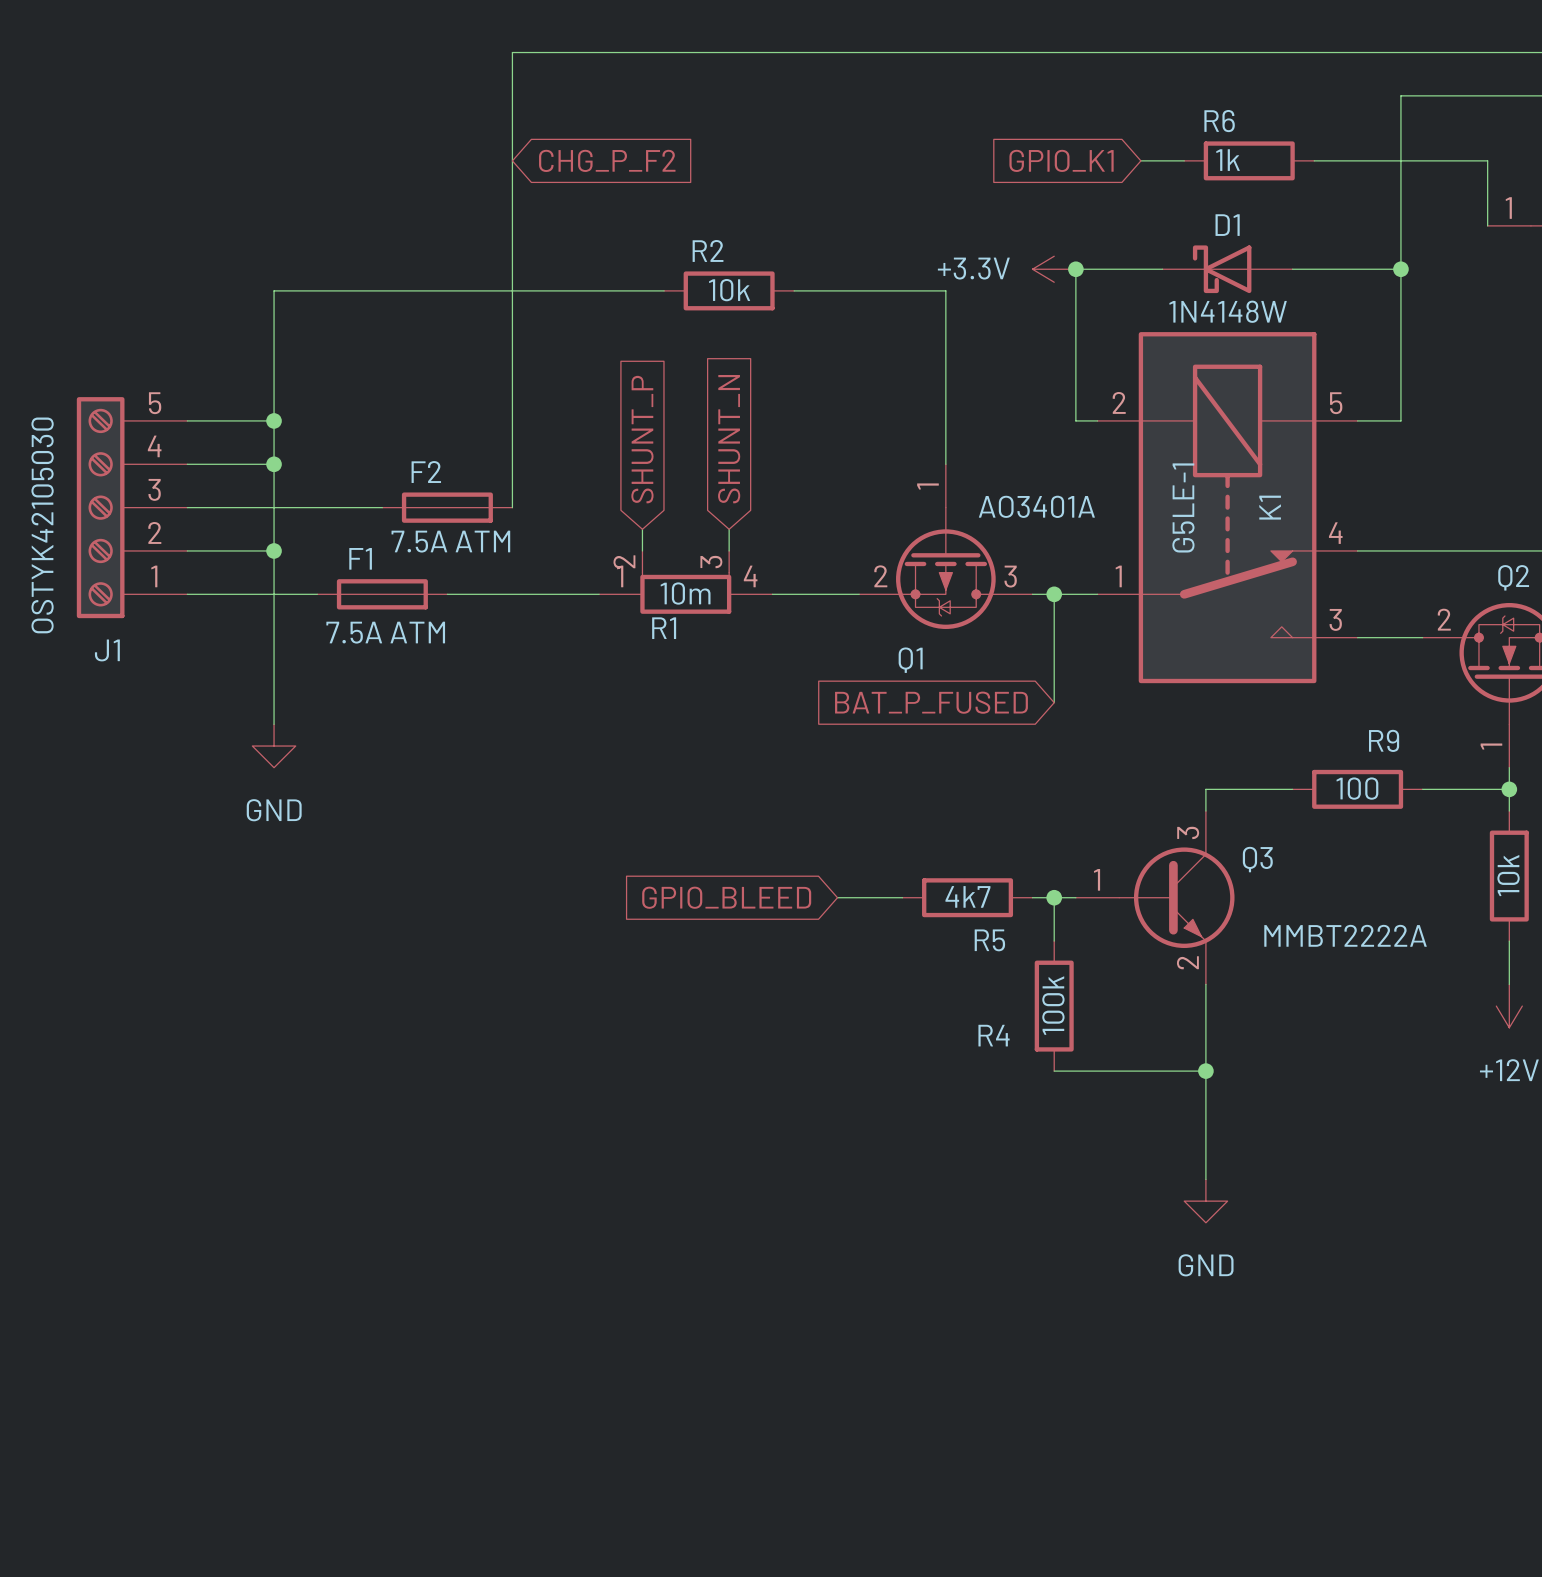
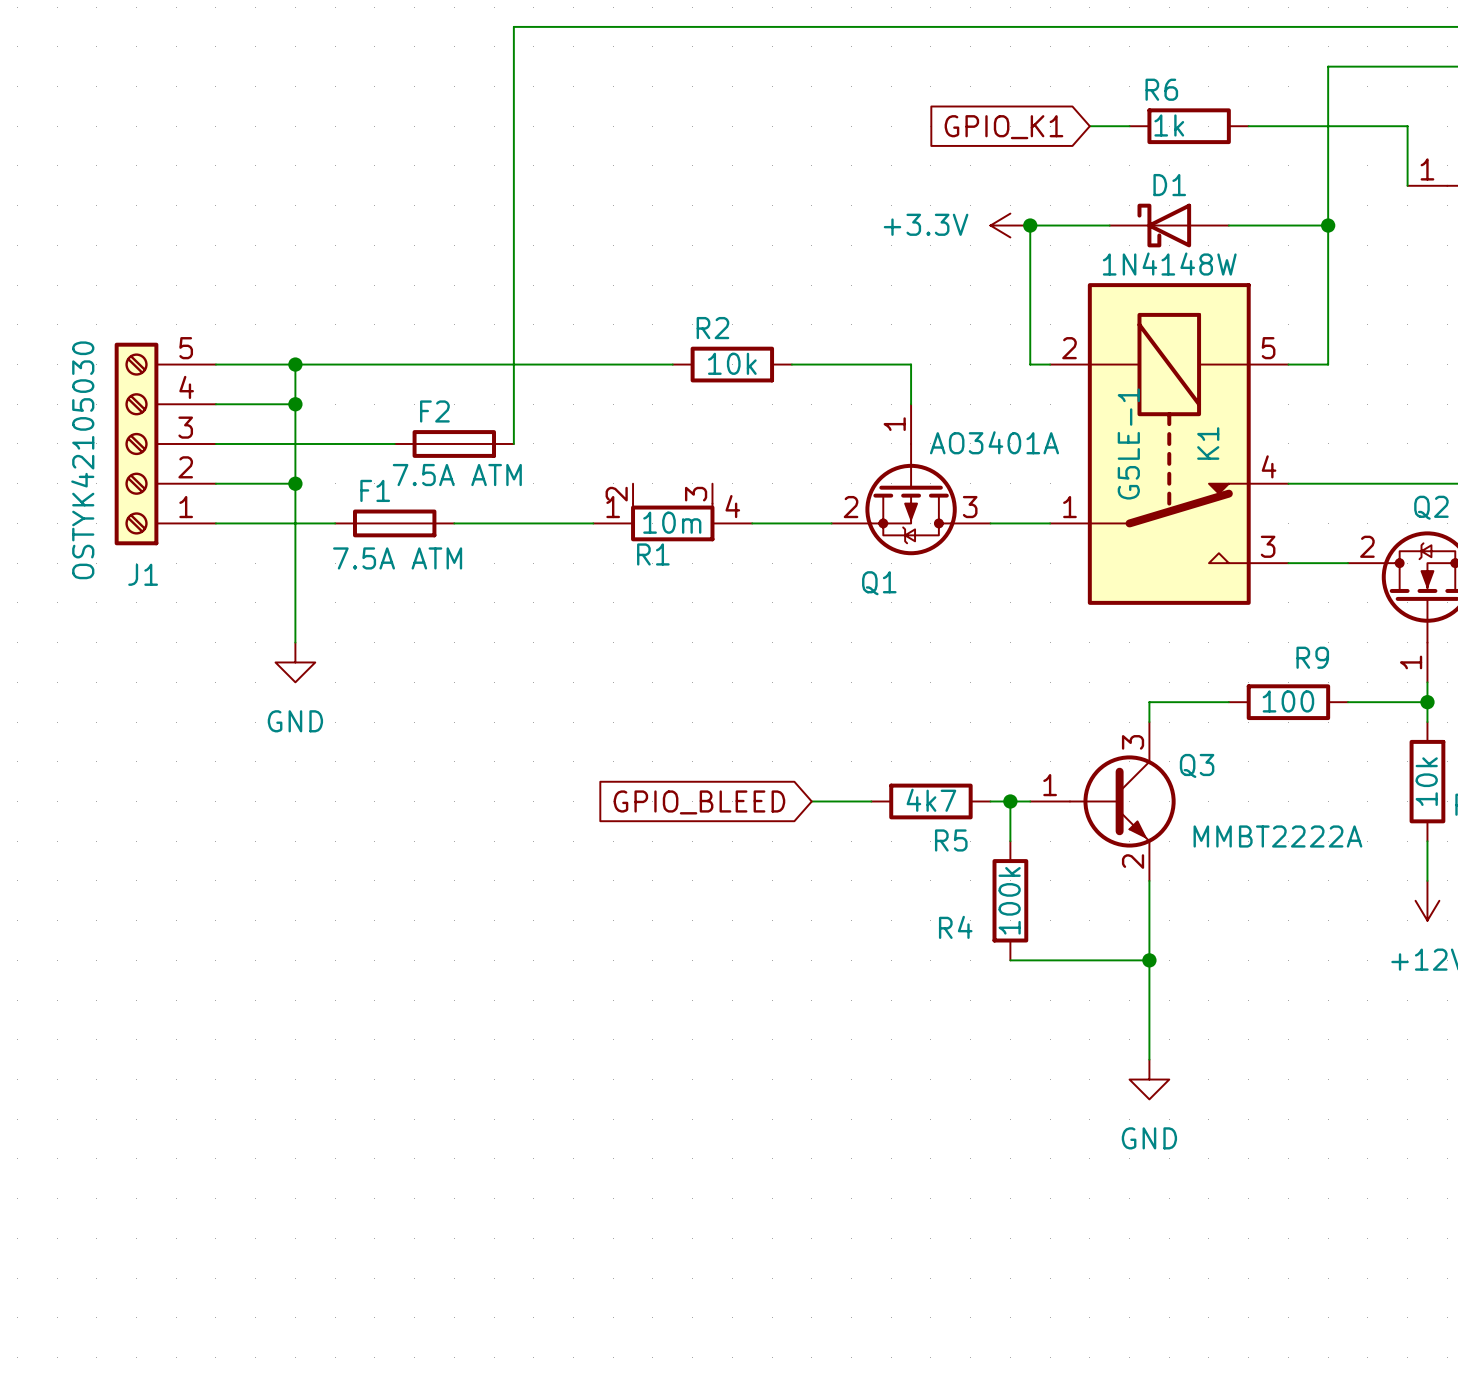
global label: CHG_P_F2 (607, 160) -> none
wire: (664, 290) (274, 290) (274, 420) -> (672, 364) (295, 364)
R2 position: (729, 290) -> (732, 364)
wire: (794, 290) (945, 290) (945, 420) -> (791, 364) (911, 364)
global label: SHUNT_P (642, 439) -> none
global label: SHUNT_N (729, 439) -> none
wire: (642, 529) (642, 550) -> none
wire: (729, 529) (729, 550) -> none
wire: (1054, 594) (1054, 702) -> none
junction: (1054, 594) -> none
global label: BAT_P_FUSED (931, 702) -> none

